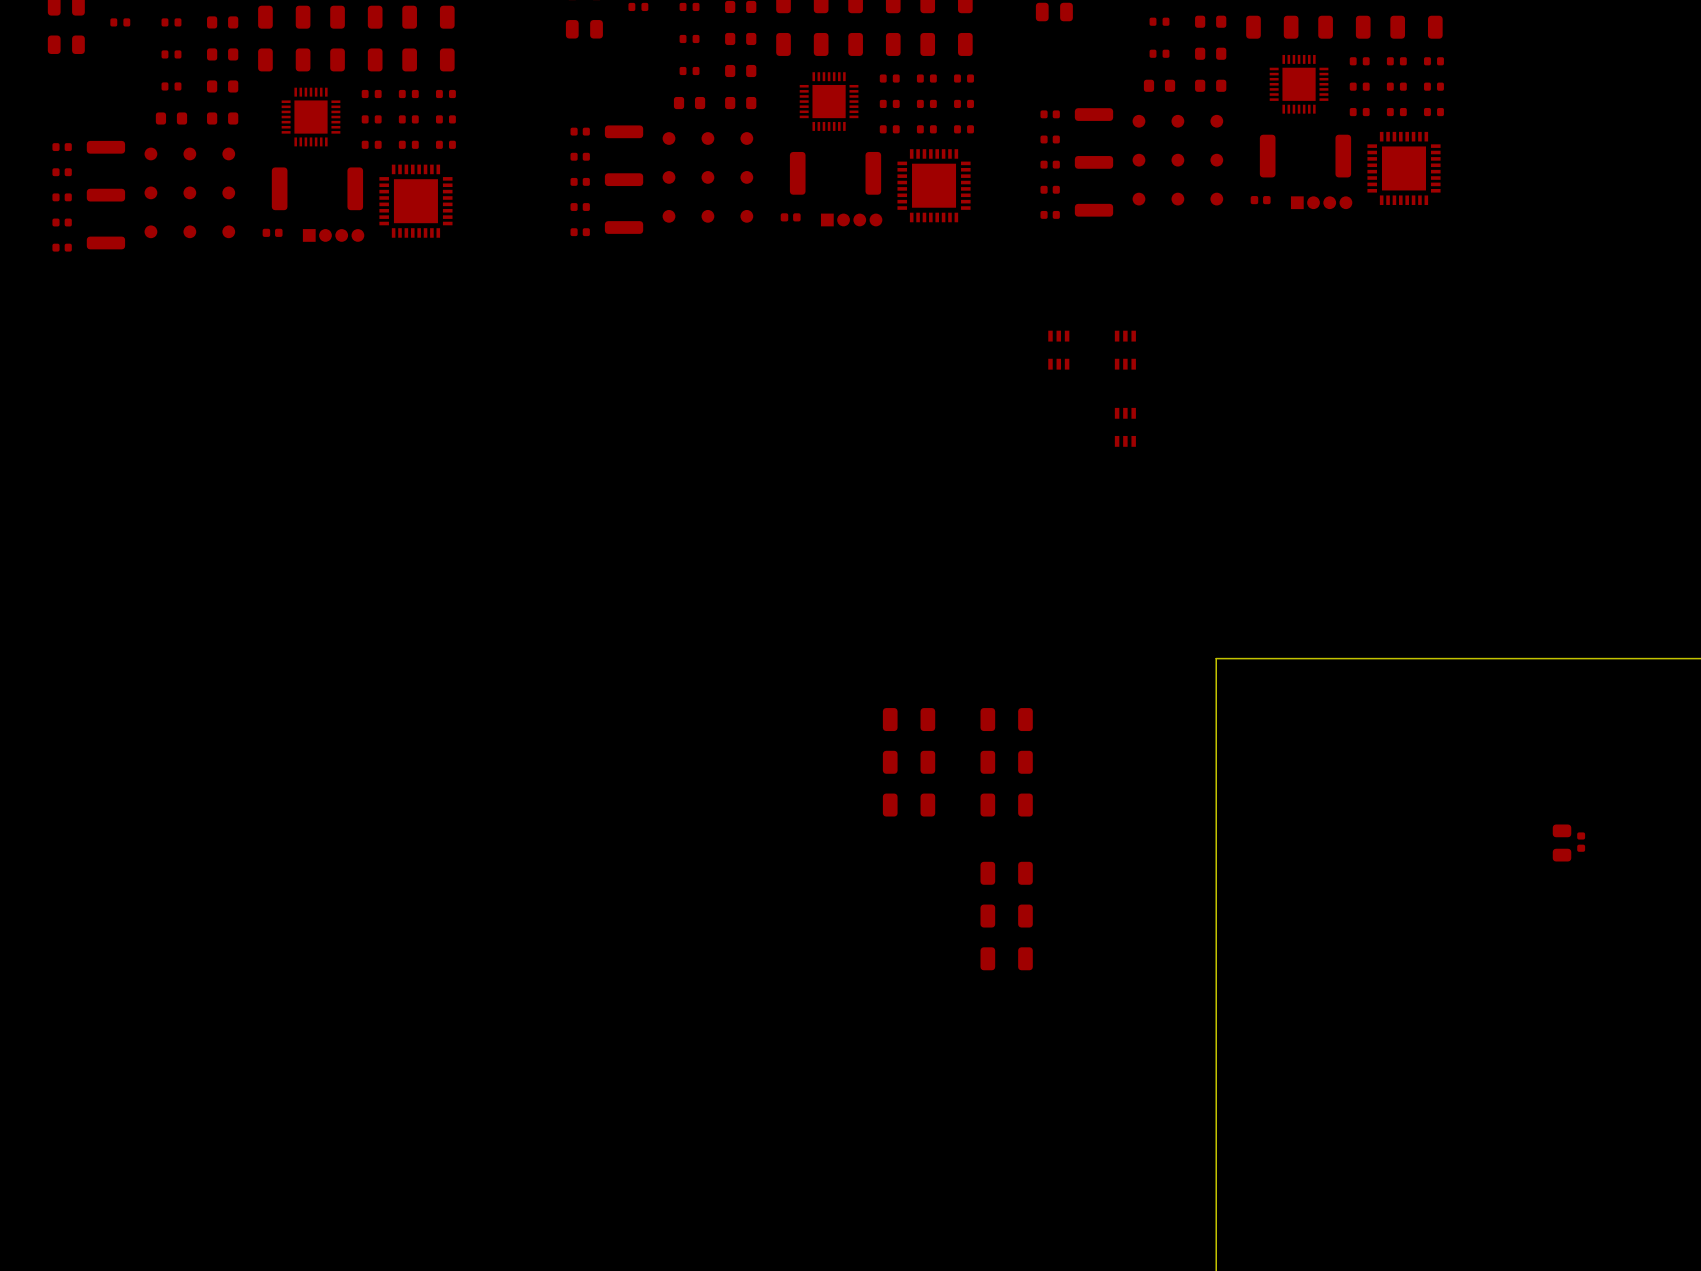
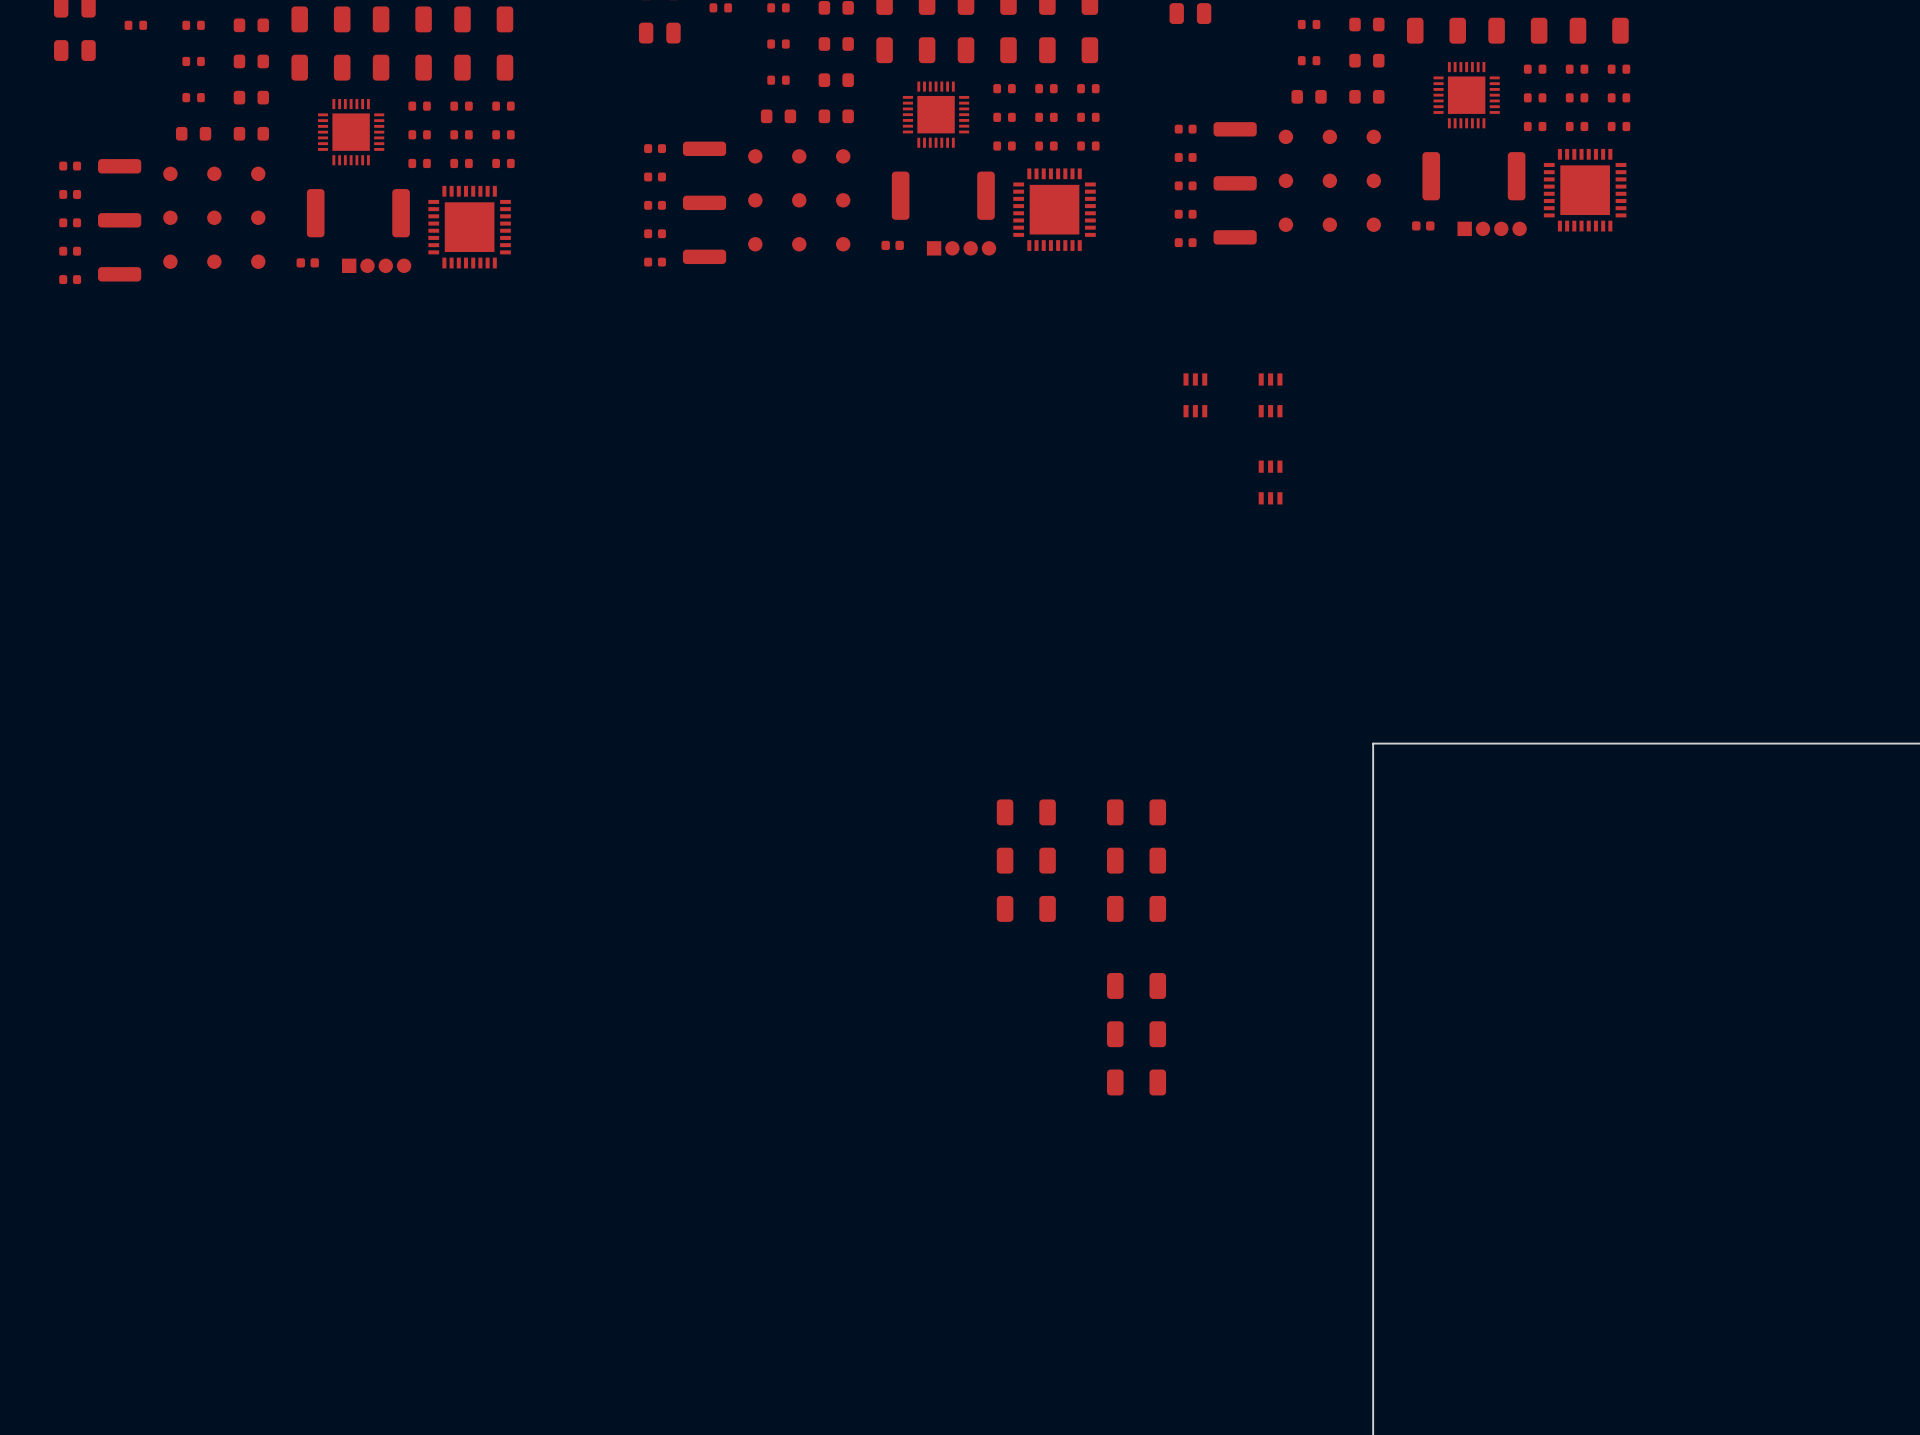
part: (1562, 842) -> none
part: (1581, 842) -> none

